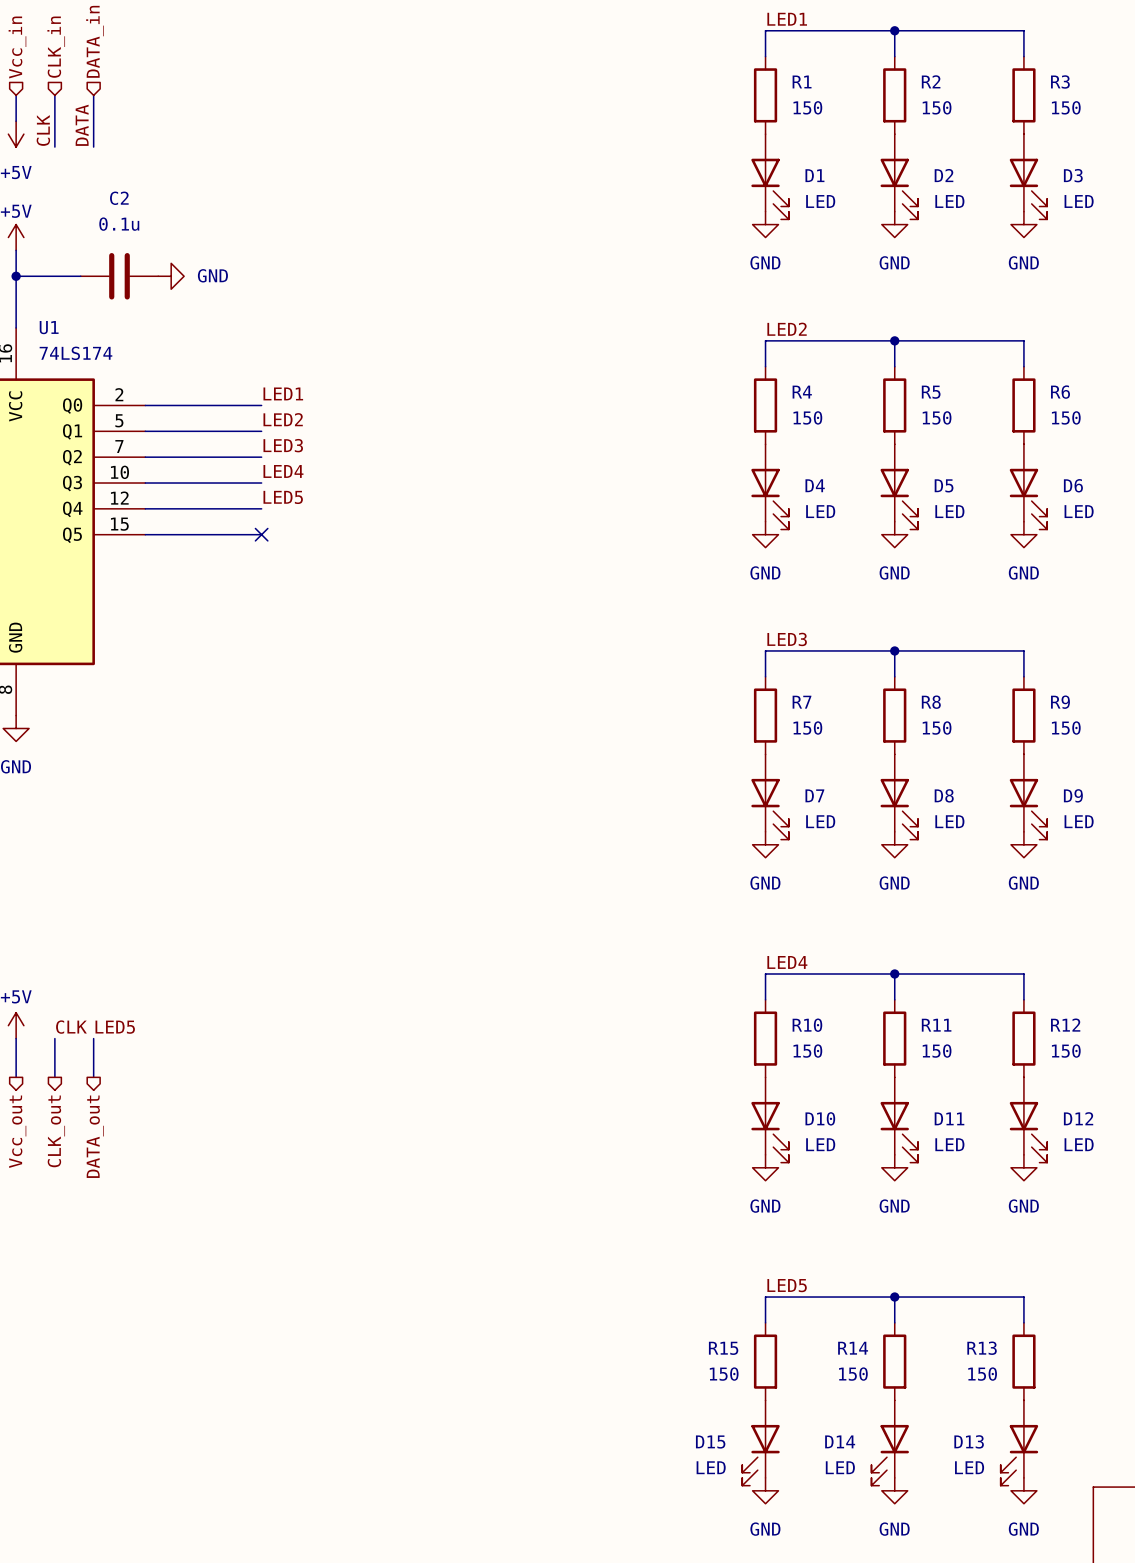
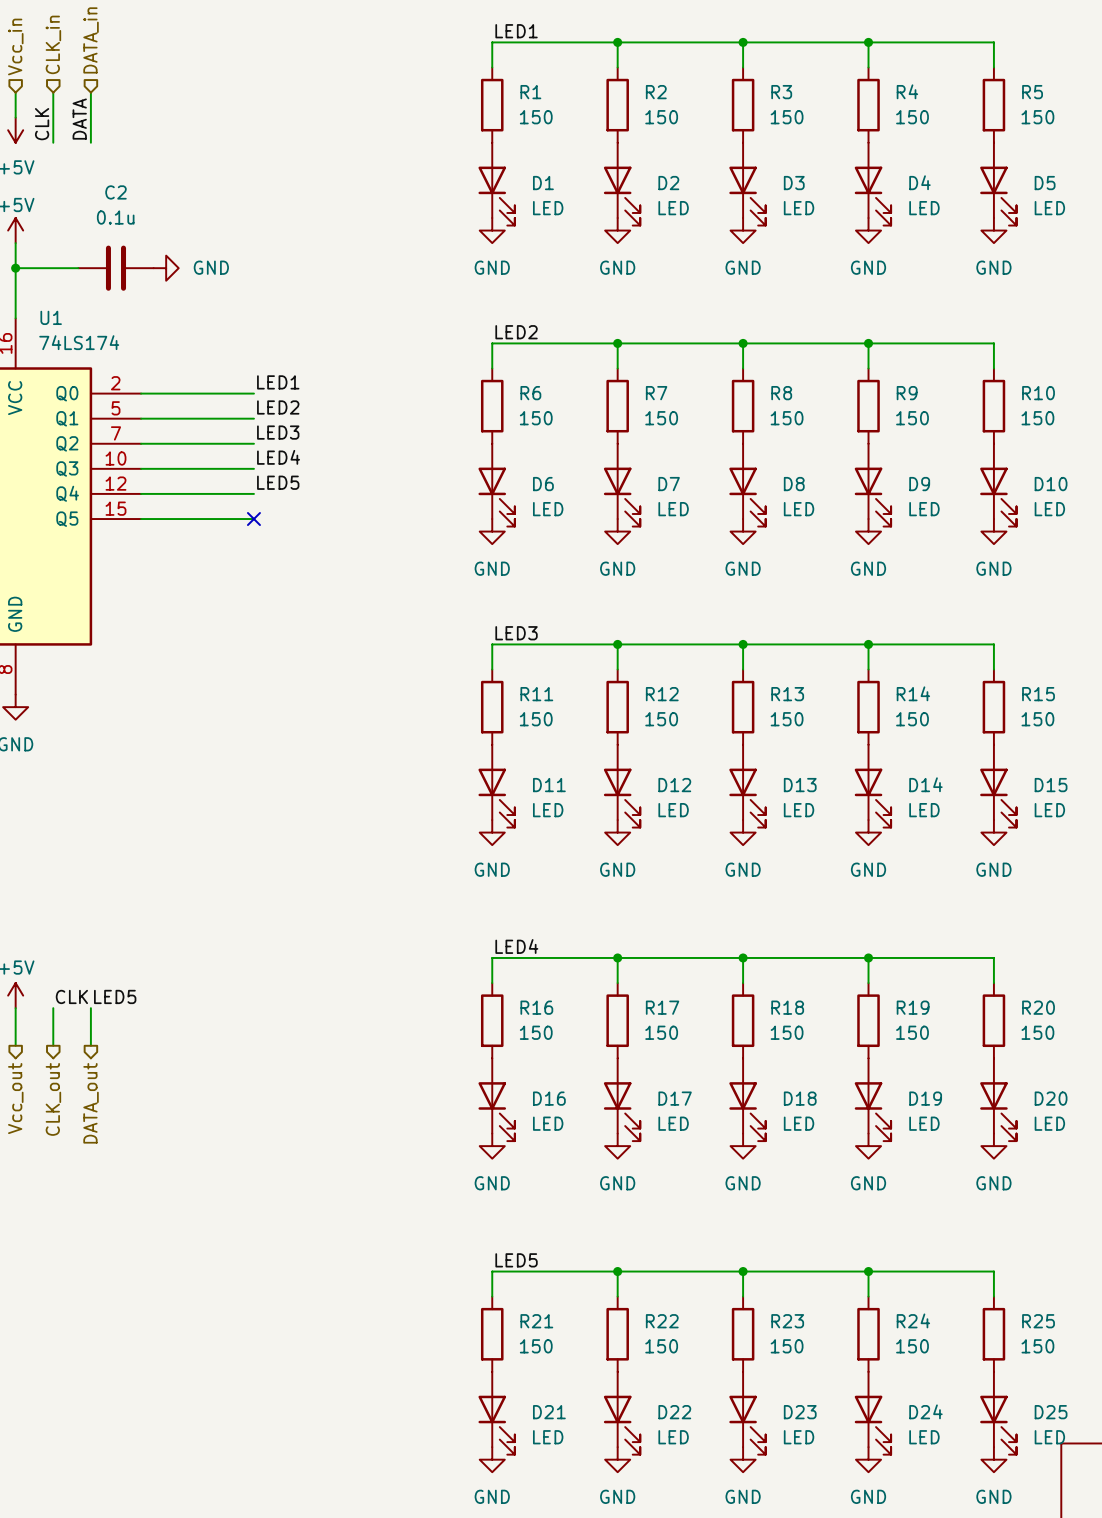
label: LED1 (787, 19) -> none
junction position: (894, 30) -> (868, 42)
label: none -> LED1 (516, 31)
wire: none -> (617, 42) (617, 67)
junction: none -> (617, 42)
wire: (765, 43) (765, 30) (1023, 30) (1023, 43) -> (492, 67) (492, 42) (993, 42)
junction: none -> (743, 42)
R1 position: (765, 95) -> (492, 105)
R2 position: (894, 95) -> (617, 105)
R3 position: (1023, 95) -> (743, 105)
D1 position: (770, 176) -> (496, 184)
D2 position: (899, 176) -> (622, 184)
D3 position: (1028, 176) -> (747, 184)
power symbol position: GND (765, 224) -> GND (743, 230)
power symbol position: GND (894, 224) -> GND (868, 230)
power symbol position: GND (1023, 224) -> GND (993, 230)
power symbol: none -> GND (492, 230)
power symbol: none -> GND (617, 230)
label: LED2 (787, 329) -> none
junction position: (894, 340) -> (868, 343)
label: none -> LED2 (516, 332)
wire: none -> (617, 343) (617, 368)
junction: none -> (617, 343)
wire: (765, 353) (765, 340) (1023, 340) (1023, 353) -> (492, 368) (492, 343) (993, 343)
junction: none -> (743, 343)
R4 position: (765, 405) -> (868, 105)
R5 position: (894, 405) -> (993, 105)
R6 position: (1023, 405) -> (492, 406)
D4 position: (770, 486) -> (872, 184)
D5 position: (899, 486) -> (998, 184)
D6 position: (1028, 486) -> (496, 485)
power symbol position: GND (765, 534) -> GND (743, 531)
power symbol position: GND (894, 534) -> GND (868, 531)
power symbol position: GND (1023, 534) -> GND (993, 531)
power symbol: none -> GND (492, 531)
power symbol: none -> GND (617, 531)
label: LED3 (787, 639) -> none
junction position: (894, 650) -> (868, 644)
label: none -> LED3 (516, 633)
wire: none -> (617, 644) (617, 669)
junction: none -> (617, 644)
wire: (765, 663) (765, 650) (1023, 650) (1023, 663) -> (492, 669) (492, 644) (993, 644)
junction: none -> (743, 644)
R7 position: (765, 715) -> (617, 406)
R8 position: (894, 715) -> (743, 406)
R9 position: (1023, 715) -> (868, 406)
D7 position: (770, 796) -> (622, 485)
D8 position: (899, 796) -> (747, 485)
D9 position: (1028, 796) -> (872, 485)
power symbol position: GND (765, 844) -> GND (743, 832)
power symbol position: GND (894, 844) -> GND (868, 832)
power symbol position: GND (1023, 844) -> GND (993, 832)
power symbol: none -> GND (492, 832)
power symbol: none -> GND (617, 832)
label: LED4 (787, 962) -> none
junction position: (894, 973) -> (868, 957)
label: none -> LED4 (516, 946)
wire: none -> (617, 957) (617, 983)
junction: none -> (617, 957)
wire: (765, 986) (765, 973) (1023, 973) (1023, 986) -> (492, 983) (492, 957) (993, 957)
junction: none -> (743, 957)
R10 position: (765, 1038) -> (993, 406)
R11 position: (894, 1038) -> (492, 707)
R12 position: (1023, 1038) -> (617, 707)
R16: none -> 150 (492, 1020)
R17: none -> 150 (617, 1020)
R18: none -> 150 (743, 1020)
R19: none -> 150 (868, 1020)
R20: none -> 150 (993, 1020)
D10 position: (770, 1120) -> (998, 485)
D11 position: (899, 1120) -> (496, 786)
D12 position: (1028, 1120) -> (622, 786)
D16: none -> LED (496, 1099)
D17: none -> LED (622, 1099)
D18: none -> LED (747, 1099)
D19: none -> LED (872, 1099)
D20: none -> LED (998, 1099)
power symbol position: GND (765, 1167) -> GND (743, 1146)
power symbol position: GND (894, 1167) -> GND (868, 1146)
power symbol position: GND (1023, 1167) -> GND (993, 1146)
power symbol: none -> GND (492, 1146)
power symbol: none -> GND (617, 1146)
label: LED5 (787, 1285) -> none
junction position: (894, 1297) -> (868, 1271)
label: none -> LED5 (516, 1260)
wire: none -> (617, 1271) (617, 1296)
junction: none -> (617, 1271)
wire: (765, 1309) (765, 1297) (1023, 1297) (1023, 1309) -> (492, 1296) (492, 1271) (993, 1271)
junction: none -> (743, 1271)
R15 name position: R15 (723, 1348) -> R15 (1038, 694)
R14 name position: R14 (853, 1348) -> R14 (913, 693)
R13 name position: R13 (982, 1348) -> R13 (787, 694)
R15 position: (765, 1361) -> (993, 707)
R14 position: (894, 1361) -> (868, 707)
R13 position: (1023, 1361) -> (743, 707)
R21: none -> 150 (492, 1334)
R22: none -> 150 (617, 1334)
R15 value position: 150 (724, 1374) -> 150 (1037, 719)
R23: none -> 150 (743, 1334)
R14 value position: 150 (853, 1374) -> 150 (912, 719)
R24: none -> 150 (868, 1334)
R13 value position: 150 (982, 1374) -> 150 (787, 719)
R25: none -> 150 (993, 1334)
D15 position: (761, 1443) -> (998, 786)
D14 position: (890, 1443) -> (872, 786)
D13 position: (1019, 1443) -> (747, 786)
D21: none -> LED (496, 1413)
D22: none -> LED (622, 1413)
D15 flip: as is (761, 1455) -> left-right (998, 798)
D23: none -> LED (747, 1413)
D14 flip: as is (890, 1455) -> left-right (872, 798)
D24: none -> LED (872, 1413)
D13 flip: as is (1019, 1455) -> left-right (747, 798)
D25: none -> LED (998, 1413)
power symbol position: GND (765, 1490) -> GND (743, 1459)
power symbol position: GND (894, 1490) -> GND (868, 1459)
power symbol position: GND (1023, 1490) -> GND (993, 1459)
power symbol: none -> GND (492, 1459)
power symbol: none -> GND (617, 1459)

